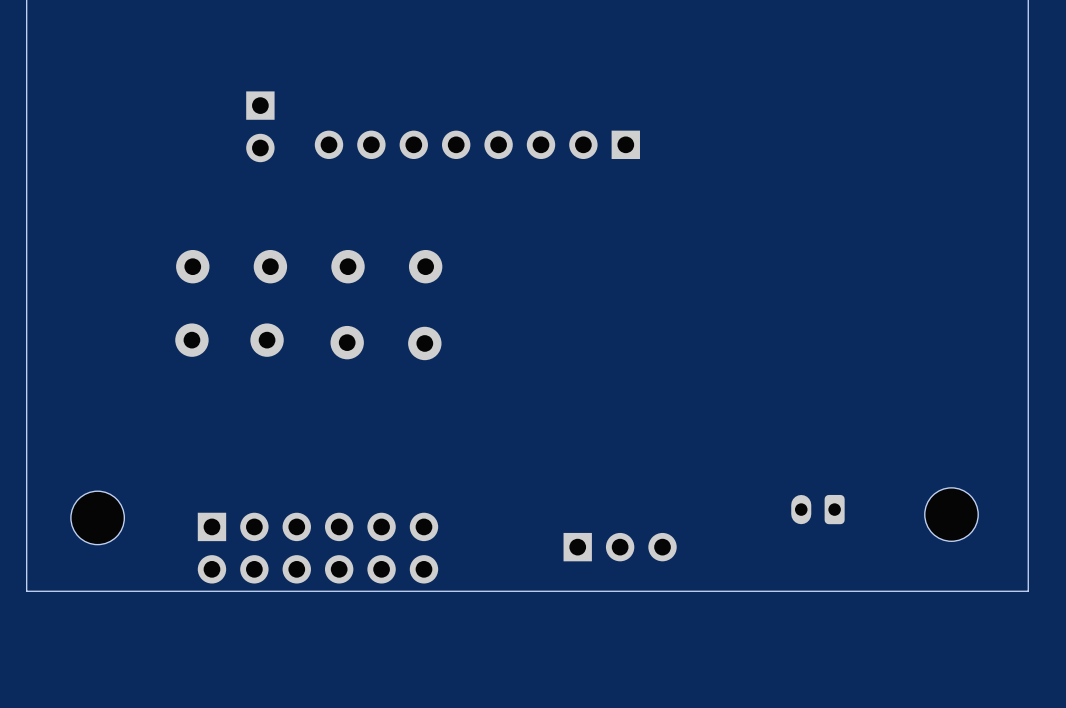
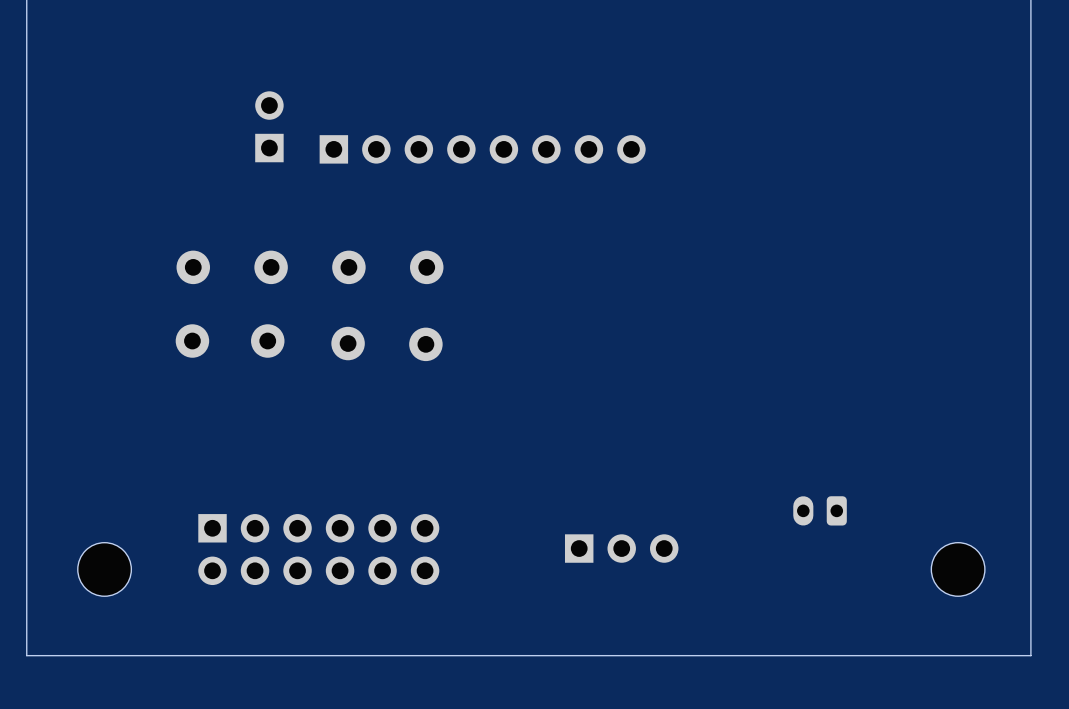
part rotation: 0° (260, 126) -> 180° (269, 126)
part rotation: 0° (477, 144) -> 180° (482, 149)
part position: (951, 514) -> (958, 569)
part position: (97, 517) -> (104, 569)
board edge: (1028, 591) (26, 591) -> (1030, 592) (1030, 655) (26, 655) (26, 592)

